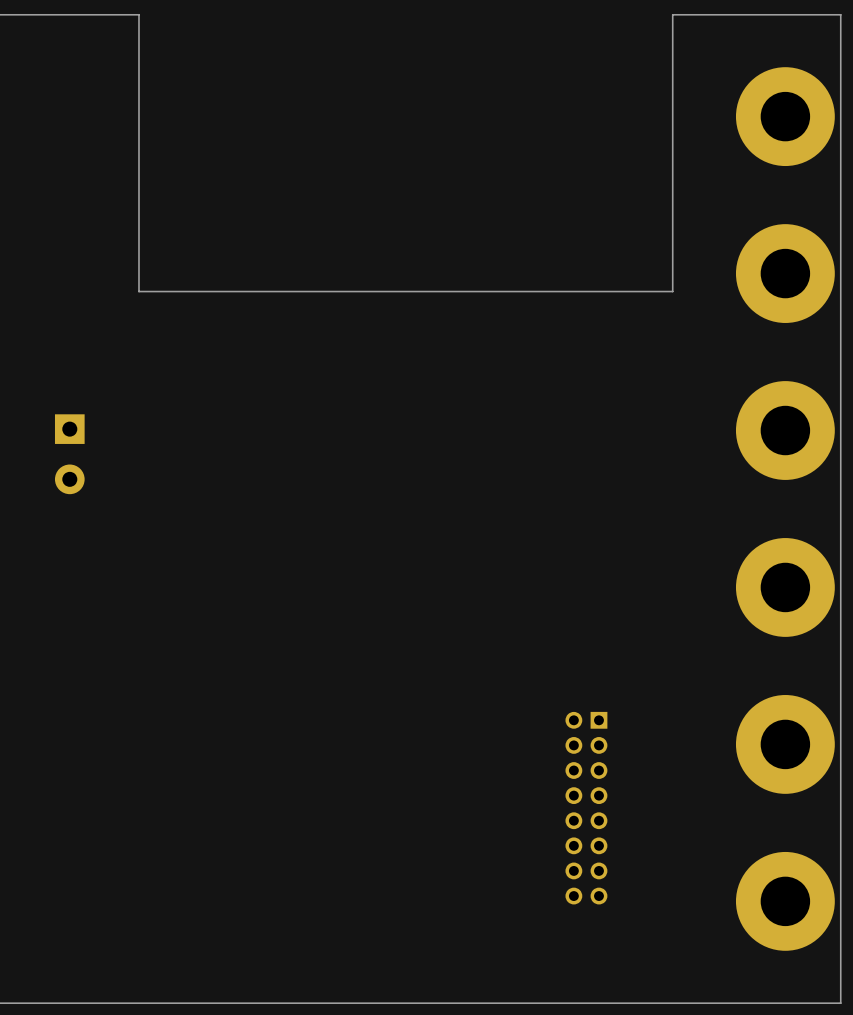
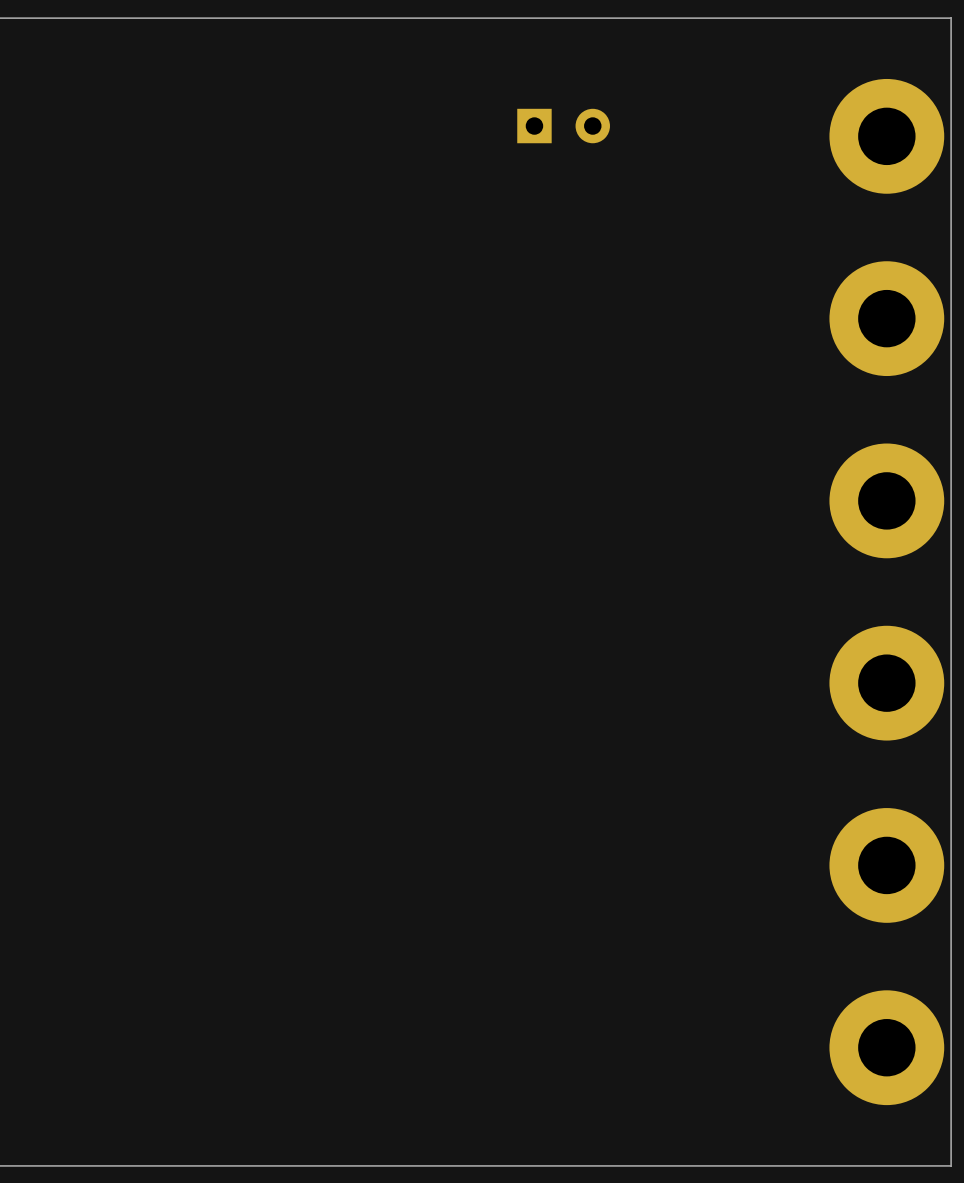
board edge: (672, 14) (672, 291) (138, 291) (138, 14) -> (755, 18) (136, 18)
part: none -> (563, 126)
part: (69, 454) -> none
part: (586, 808) -> none

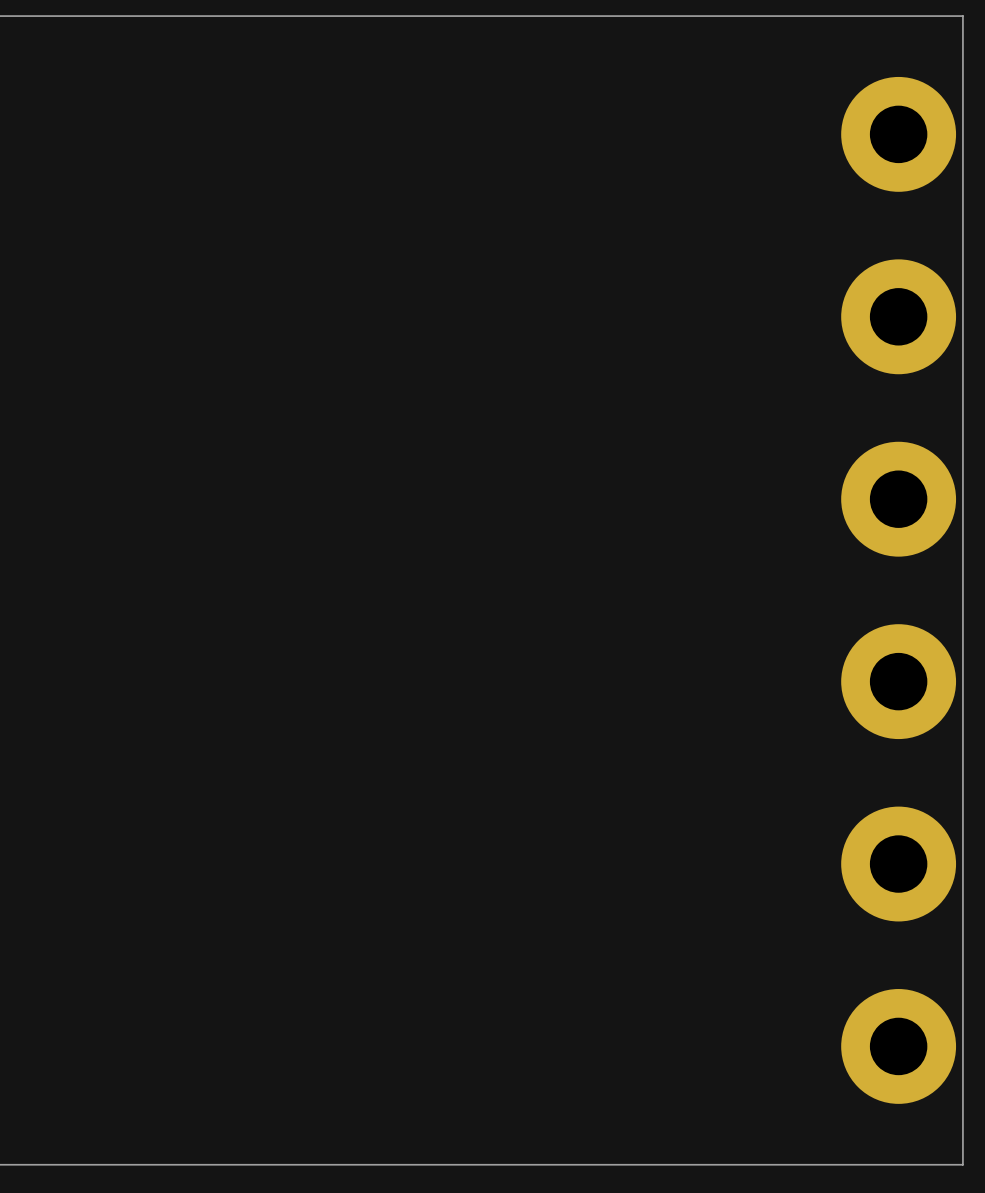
part: (563, 126) -> none

